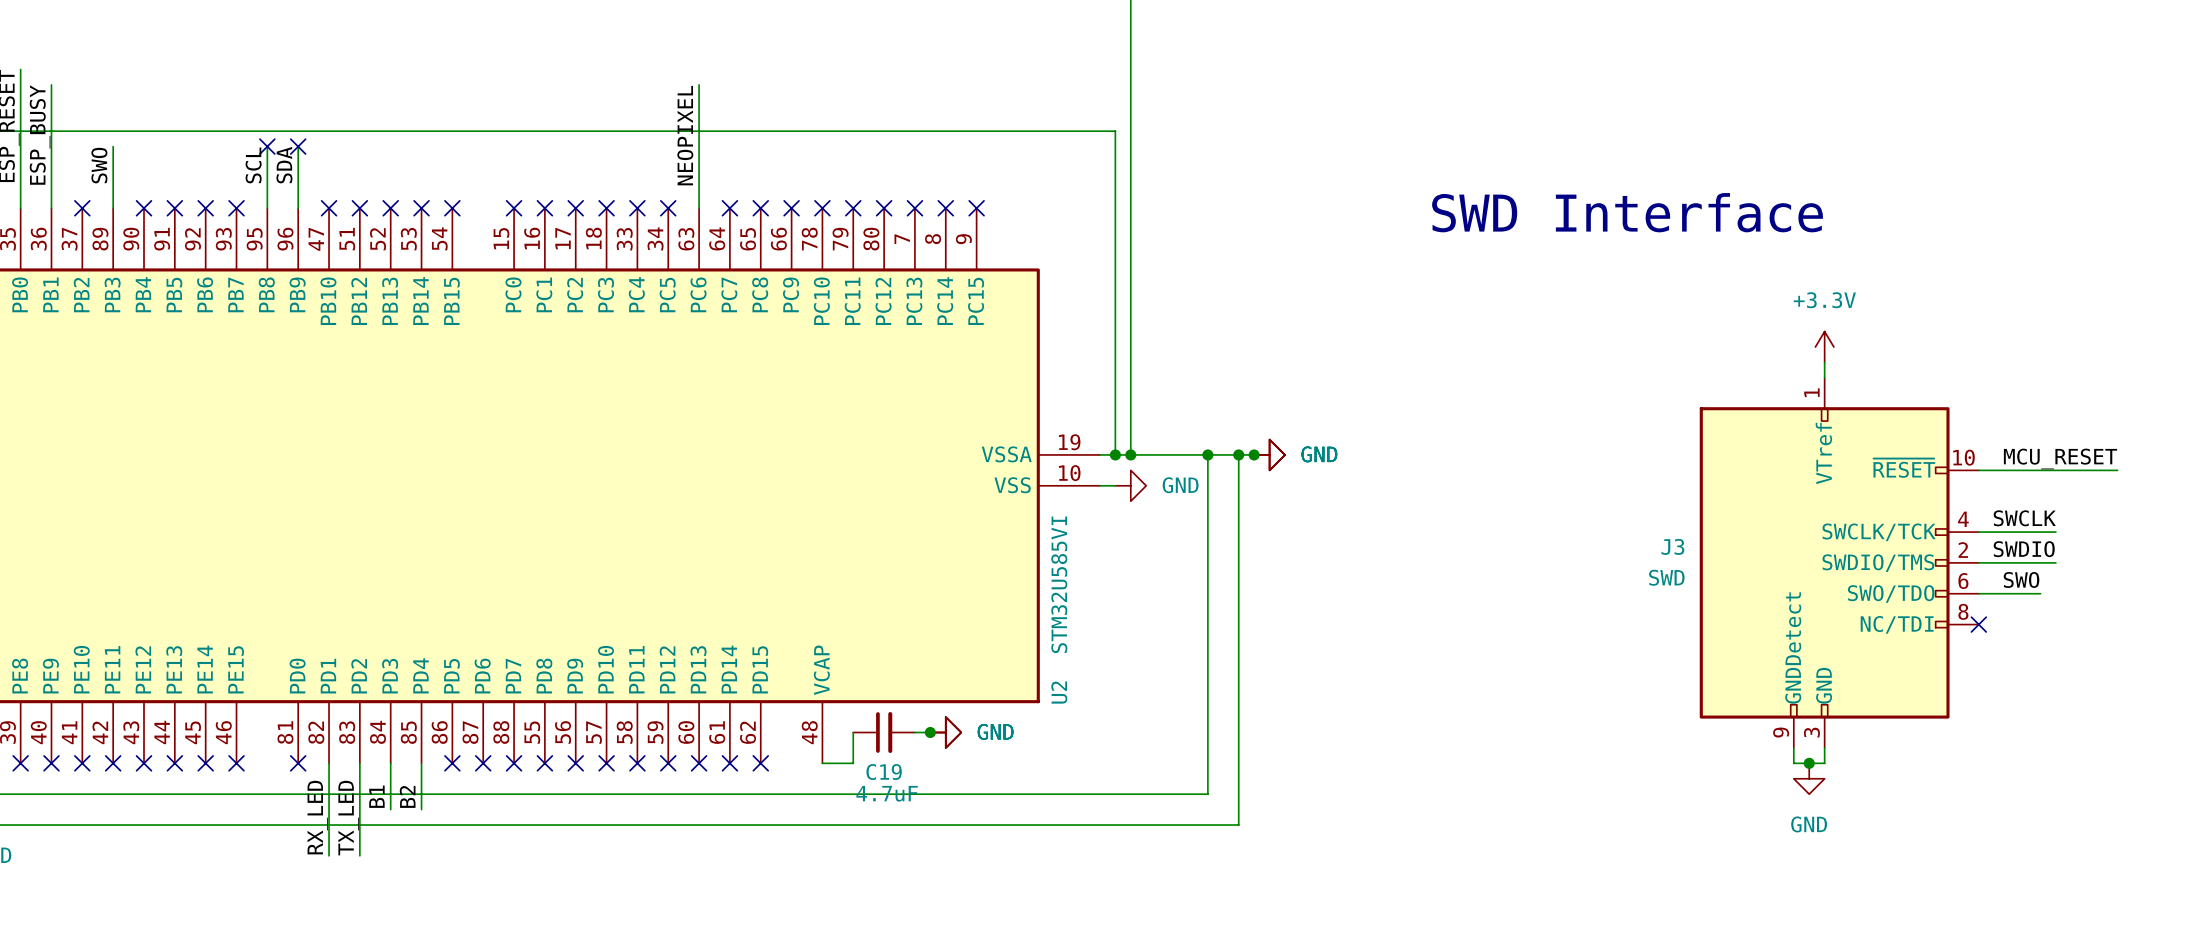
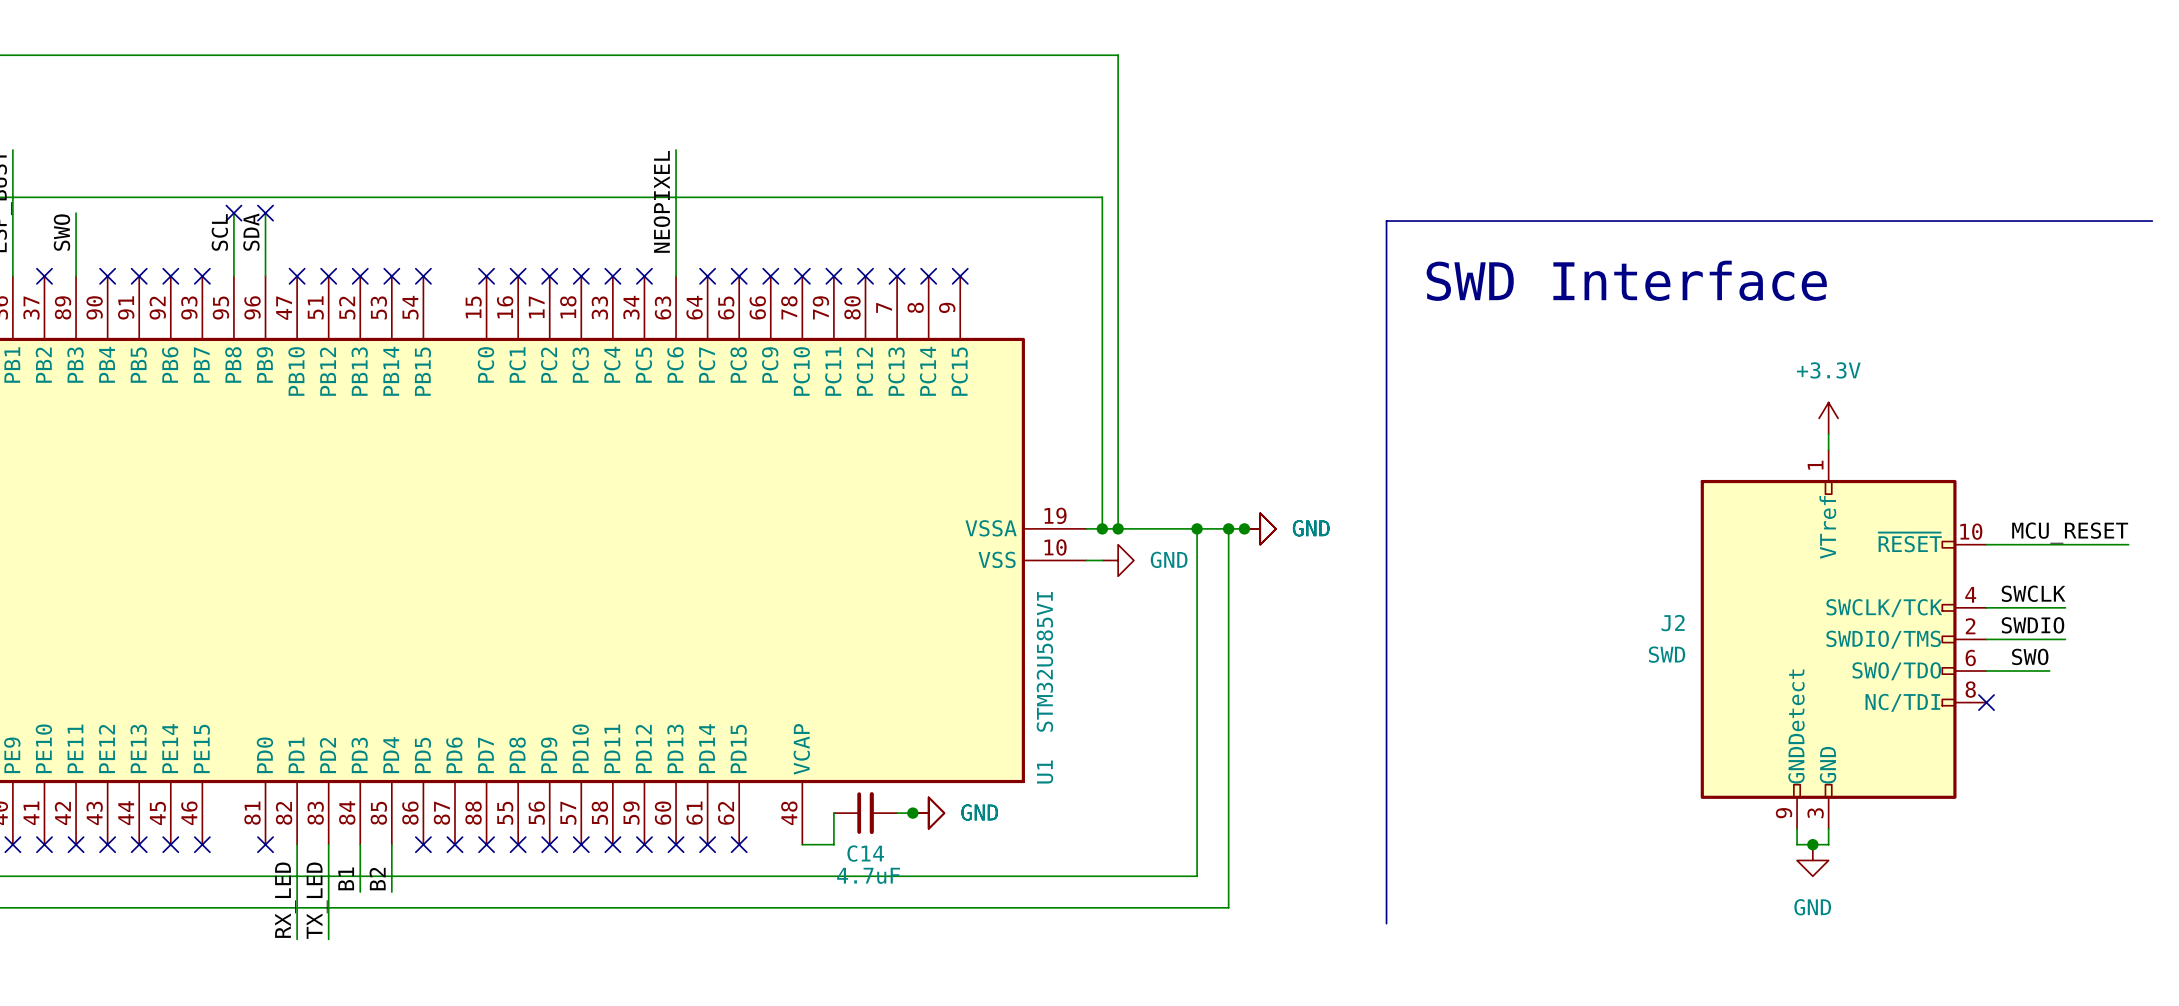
line: none -> (2152, 221) (1386, 221) (1386, 923)
J3 name: J3 (1672, 546) -> J2 (1673, 623)
U2 name: U2 (1059, 692) -> U1 (1045, 772)
C19 name: C19 (884, 772) -> C14 (865, 853)

